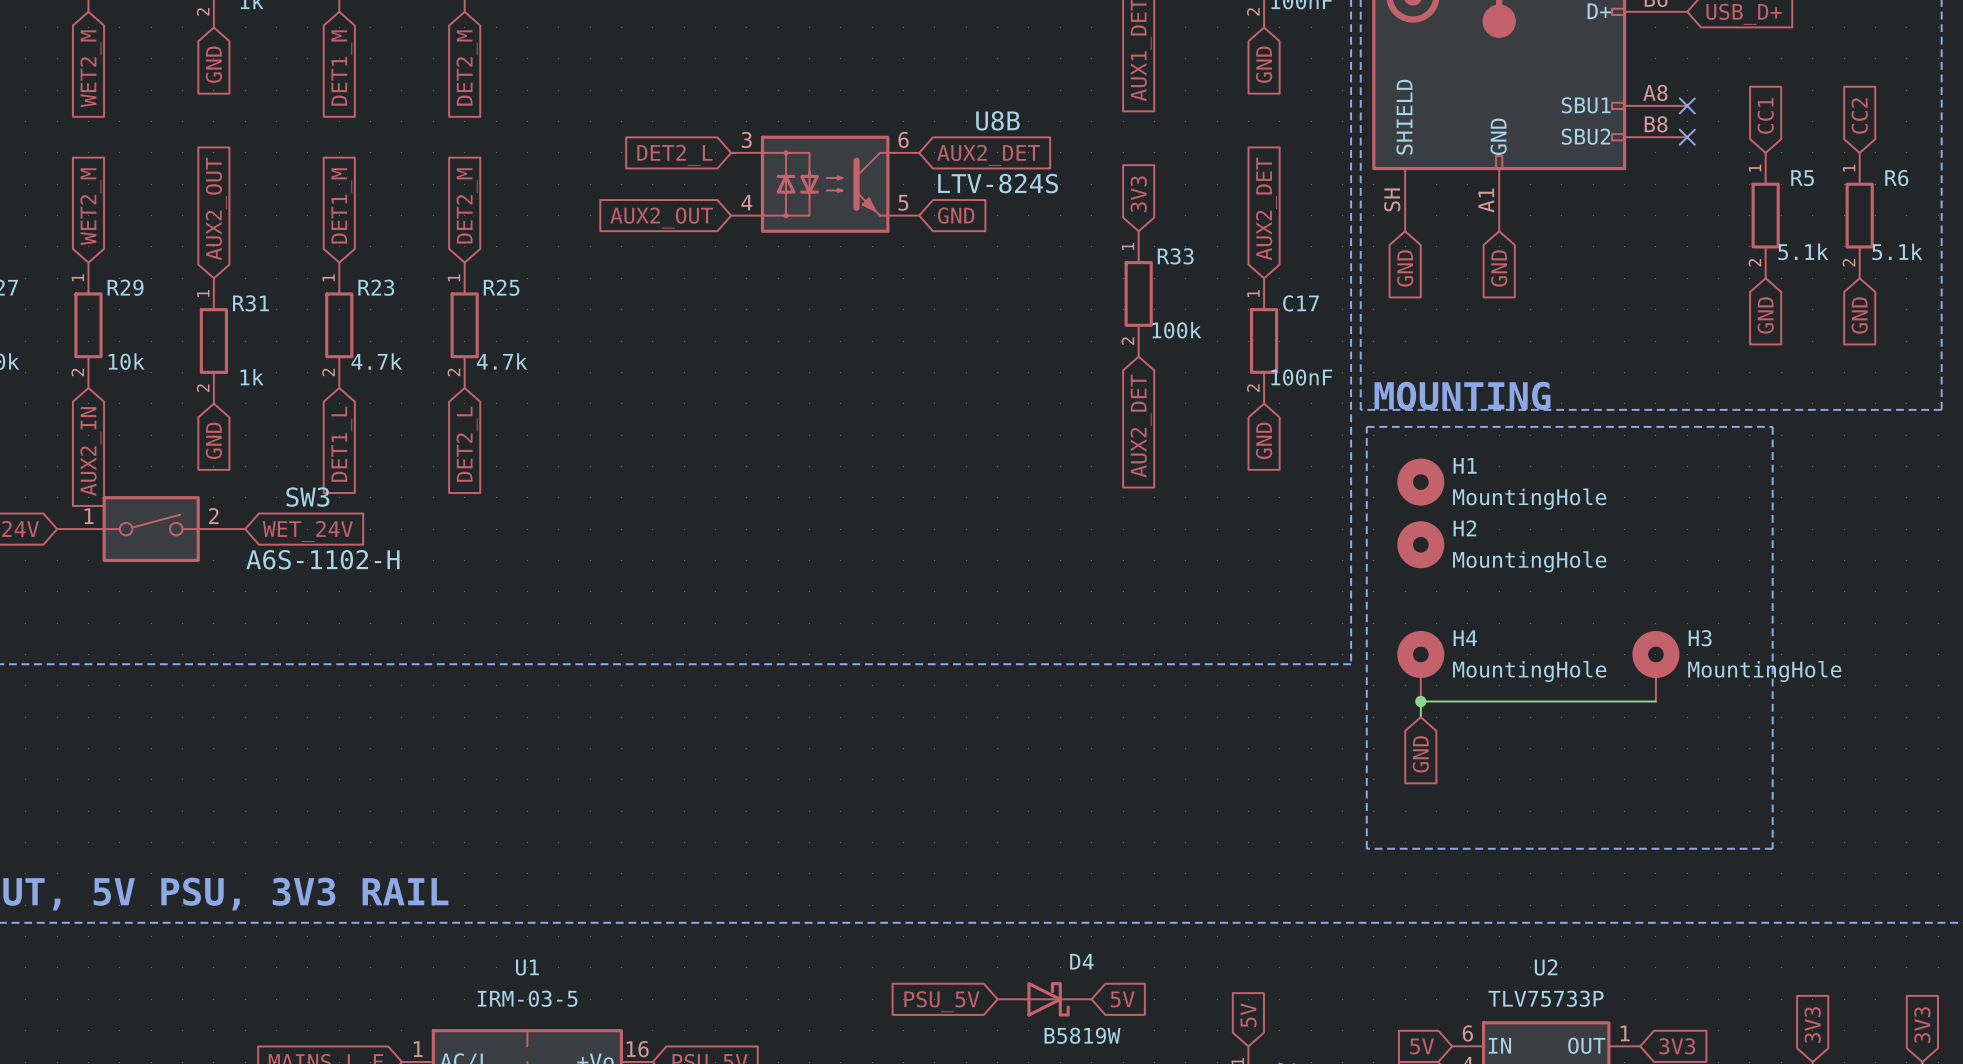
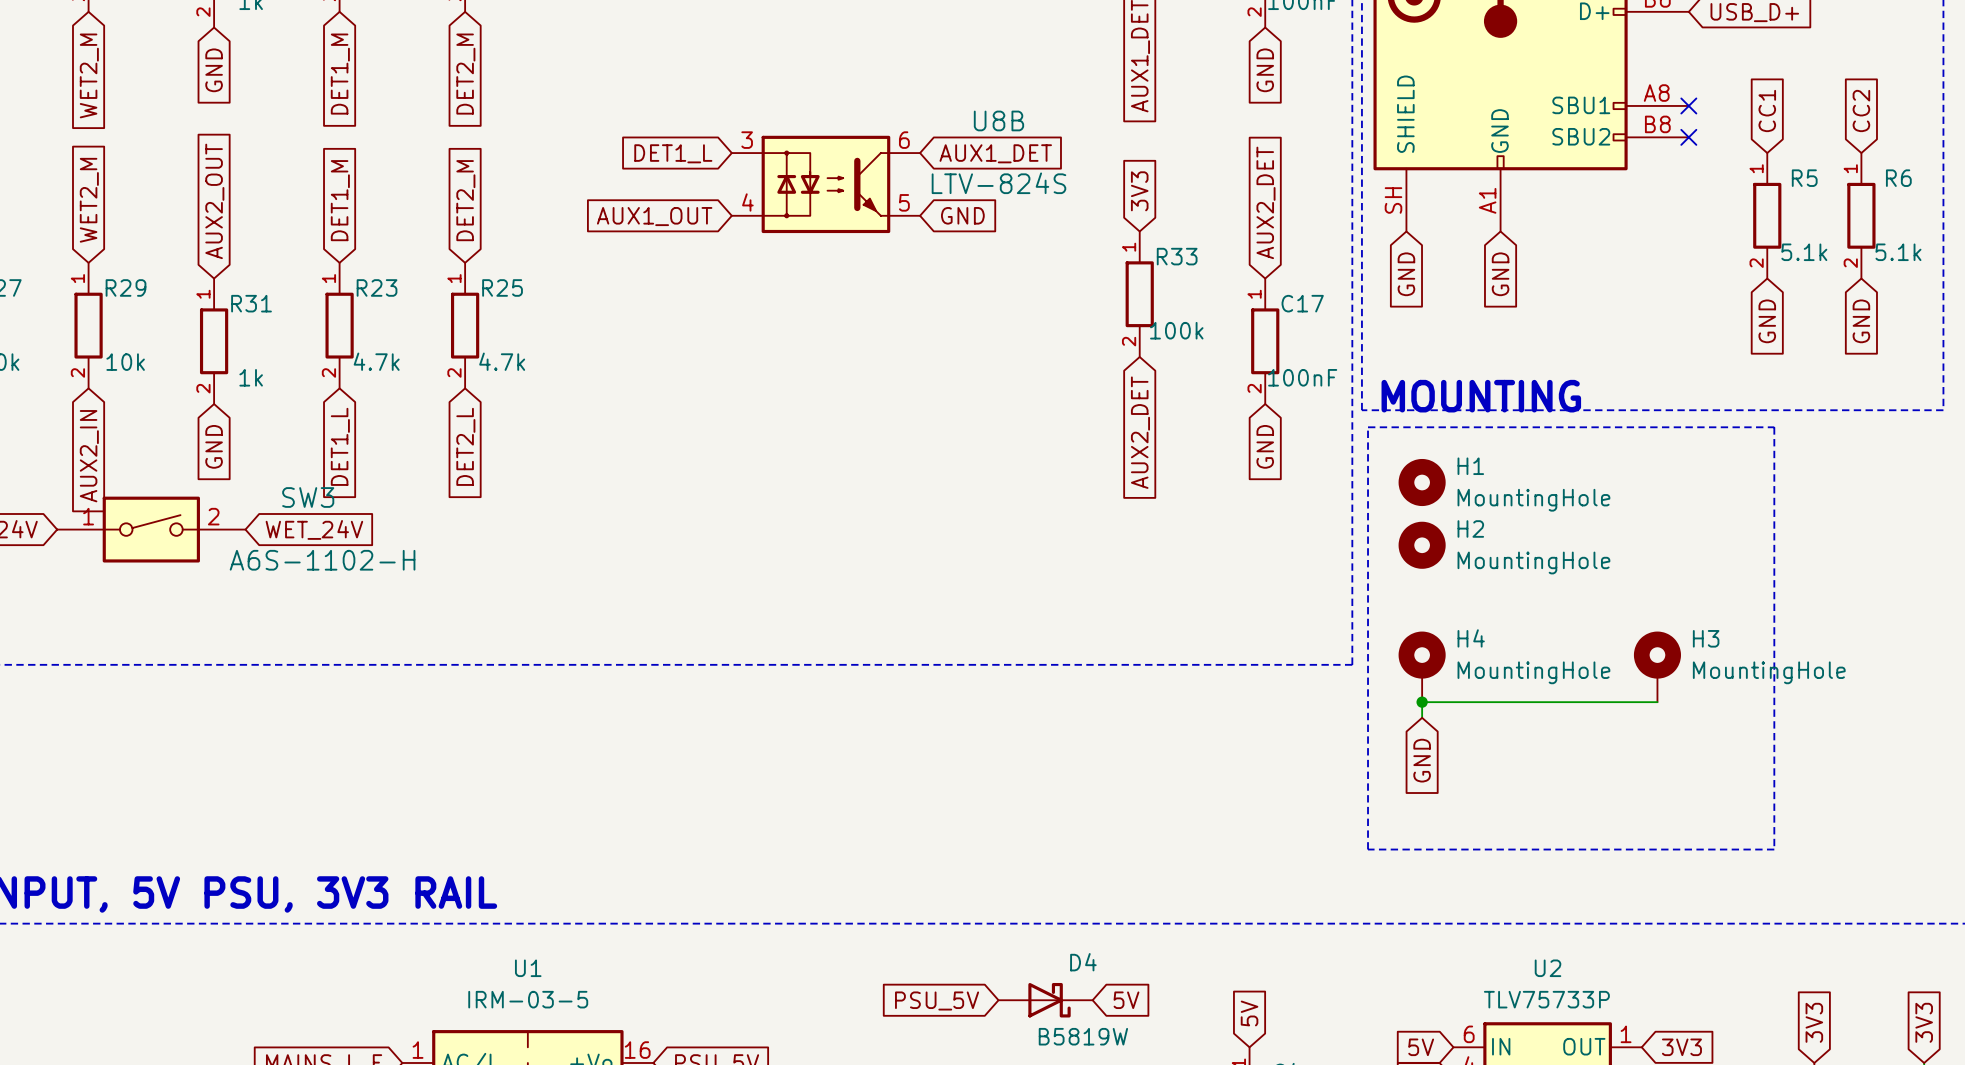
global label: DET2_L (674, 155) -> DET1_L (673, 153)
global label: AUX2_DET (988, 155) -> AUX1_DET (995, 153)
global label: AUX2_OUT (661, 217) -> AUX1_OUT (654, 216)

